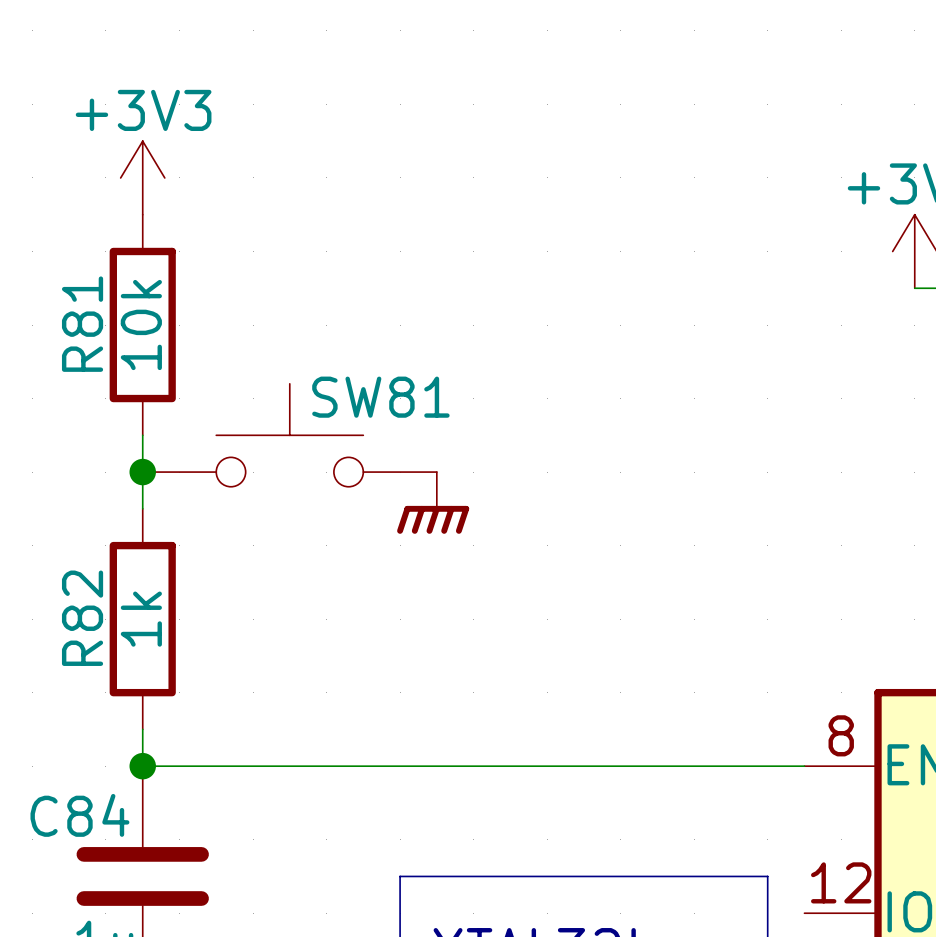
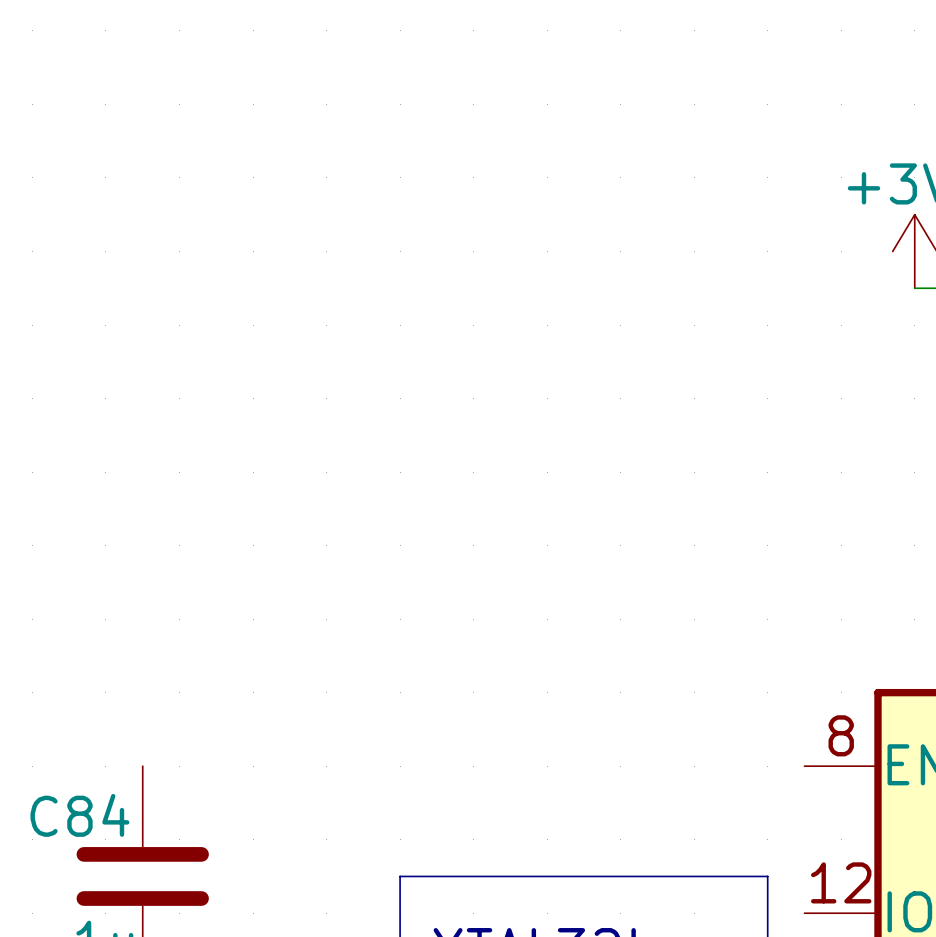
power symbol: +3V3 (142, 177) -> none
R81: 10k (142, 325) -> none
wire: (142, 435) (142, 508) -> none
SW81: (289, 435) -> none
junction: (142, 472) -> none
power symbol: (433, 502) -> none
R82: 1k (142, 619) -> none
wire: (142, 729) (142, 766) (804, 766) -> none
junction: (142, 766) -> none

